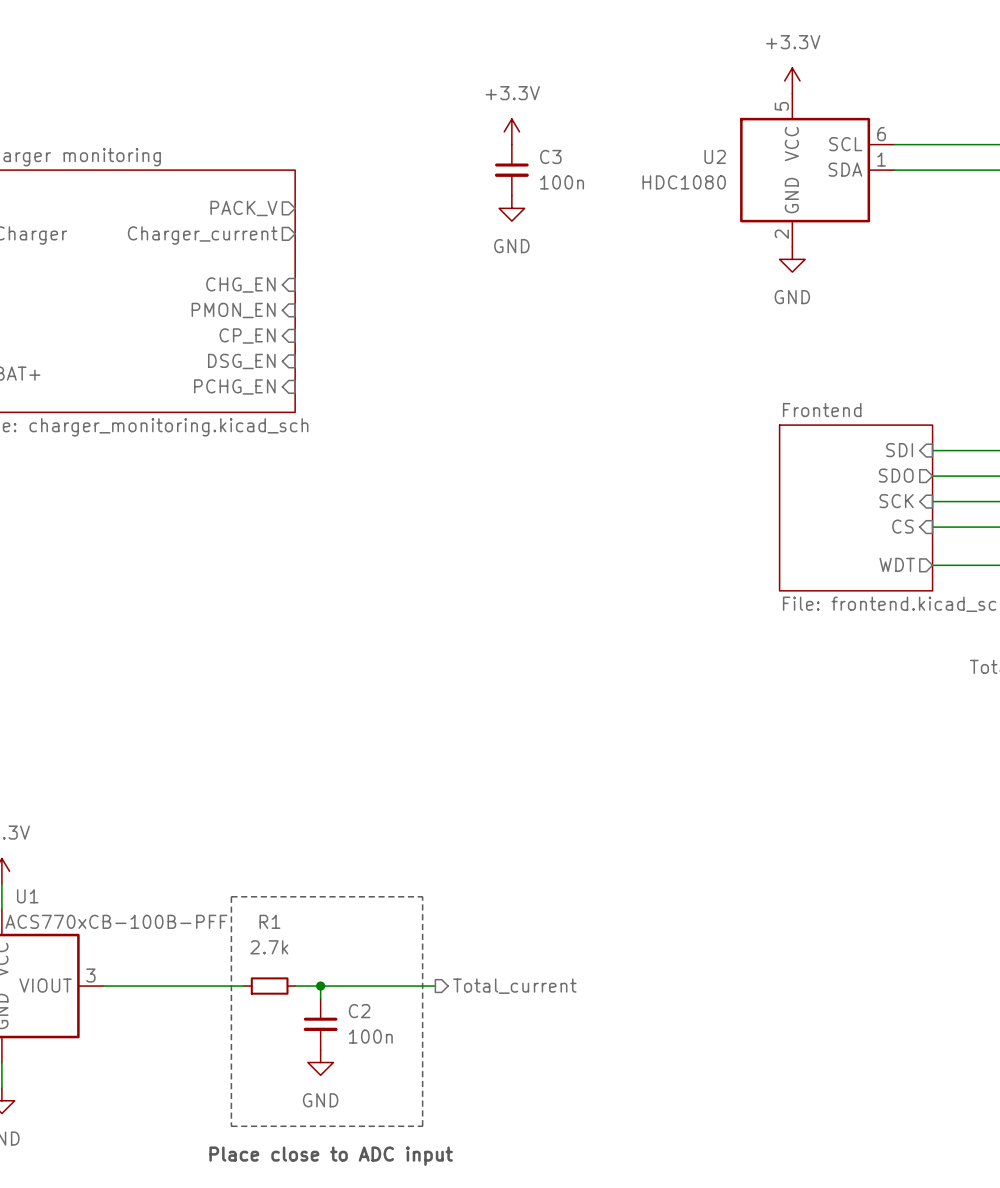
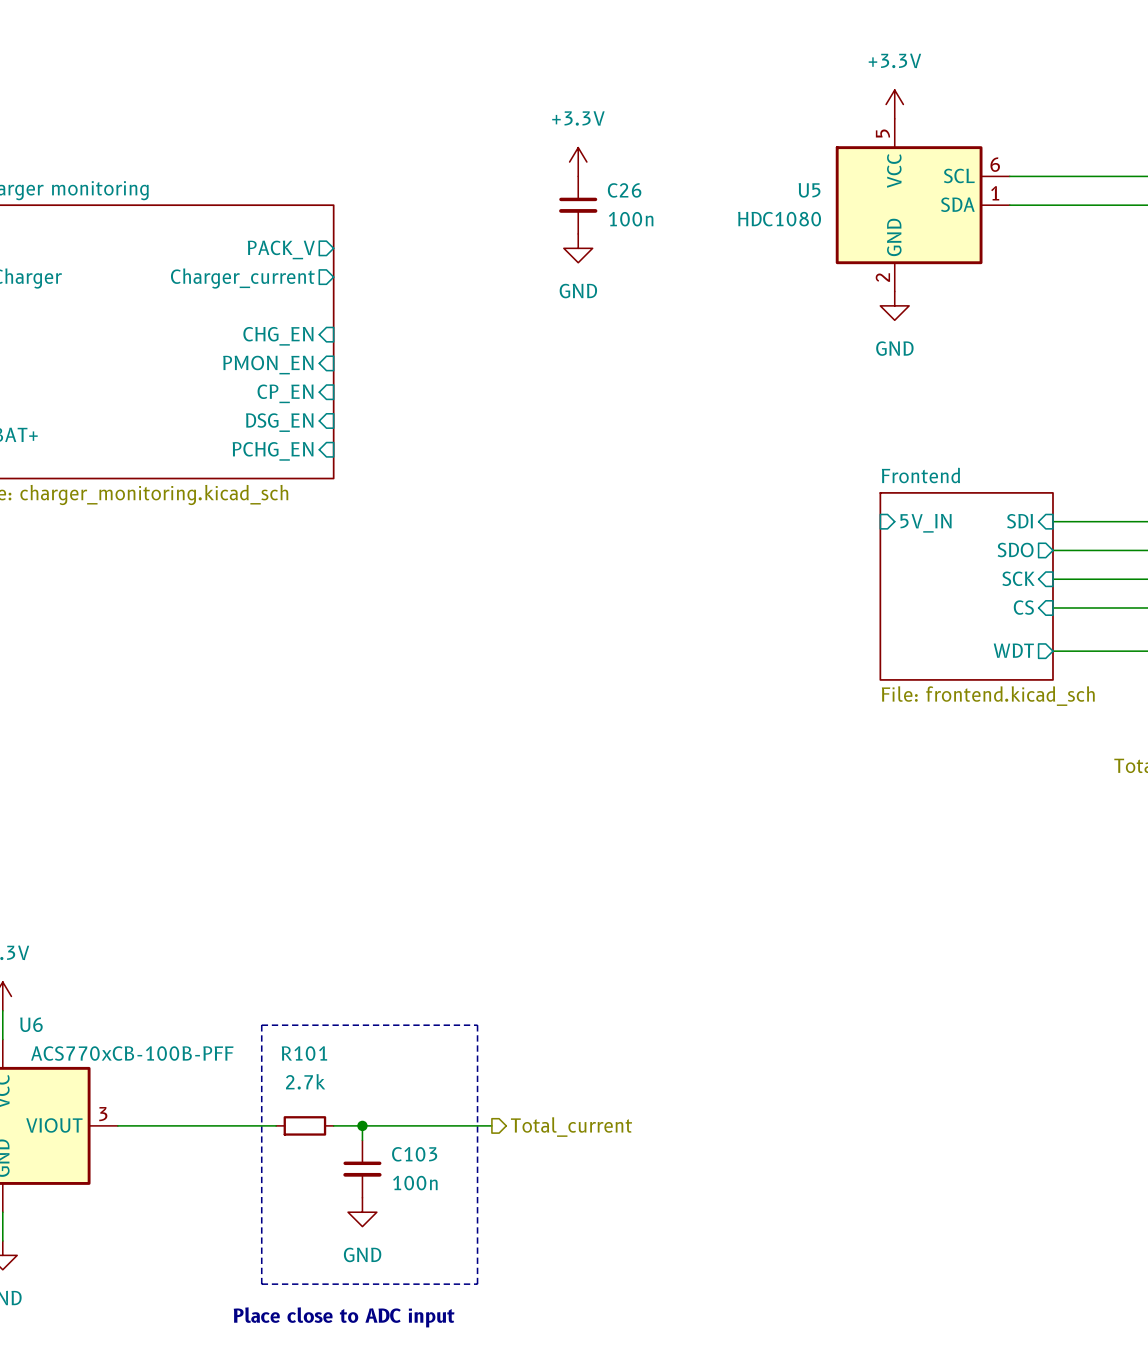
C3 name: C3 (550, 156) -> C26 (624, 190)
U2 name: U2 (715, 156) -> U5 (809, 190)
sheet pin: none -> 5V_IN (926, 523)
U1 name: U1 (27, 896) -> U6 (31, 1024)
R1 name: R1 (269, 921) -> R101 (304, 1053)
C2 name: C2 (359, 1011) -> C103 (414, 1154)

